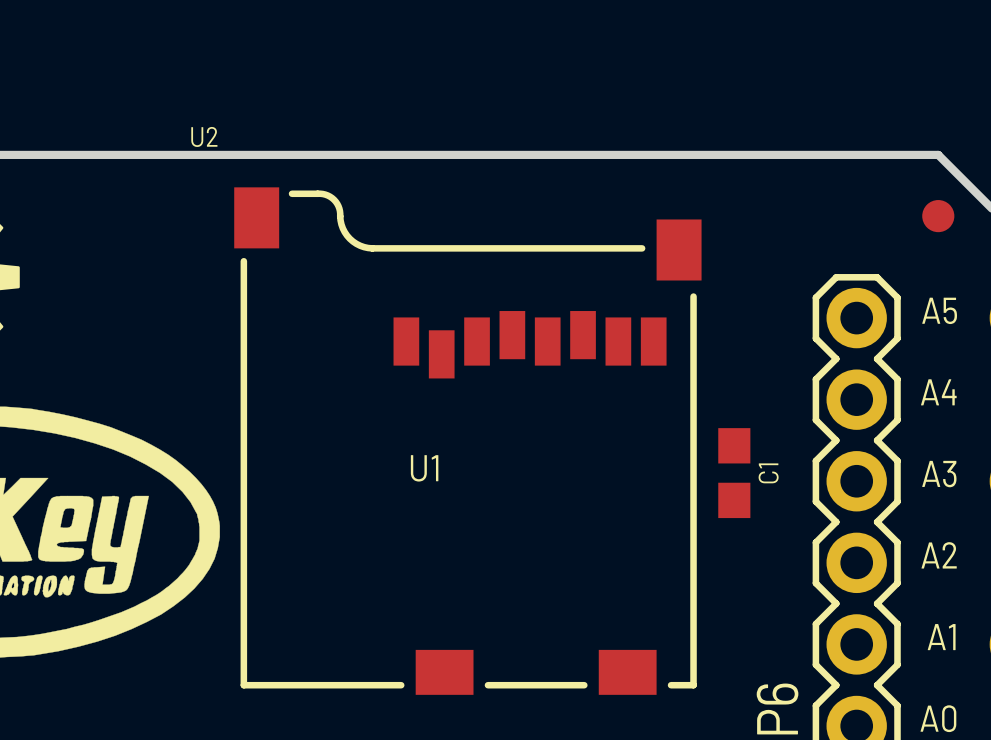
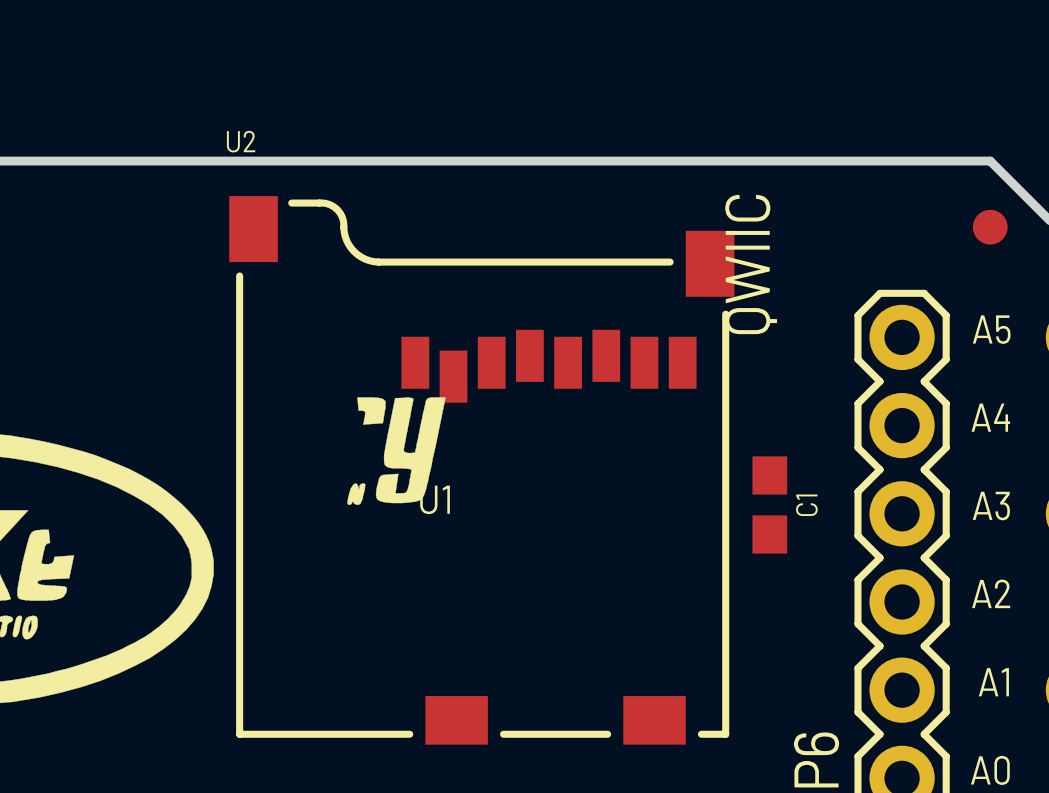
U2 name position: U2 (204, 136) -> U2 (241, 141)
text: none -> QWIIC (751, 264)
drawing position: (80, 508) -> (371, 411)
drawing position: (116, 544) -> (410, 450)
drawing position: (66, 585) -> (356, 494)

